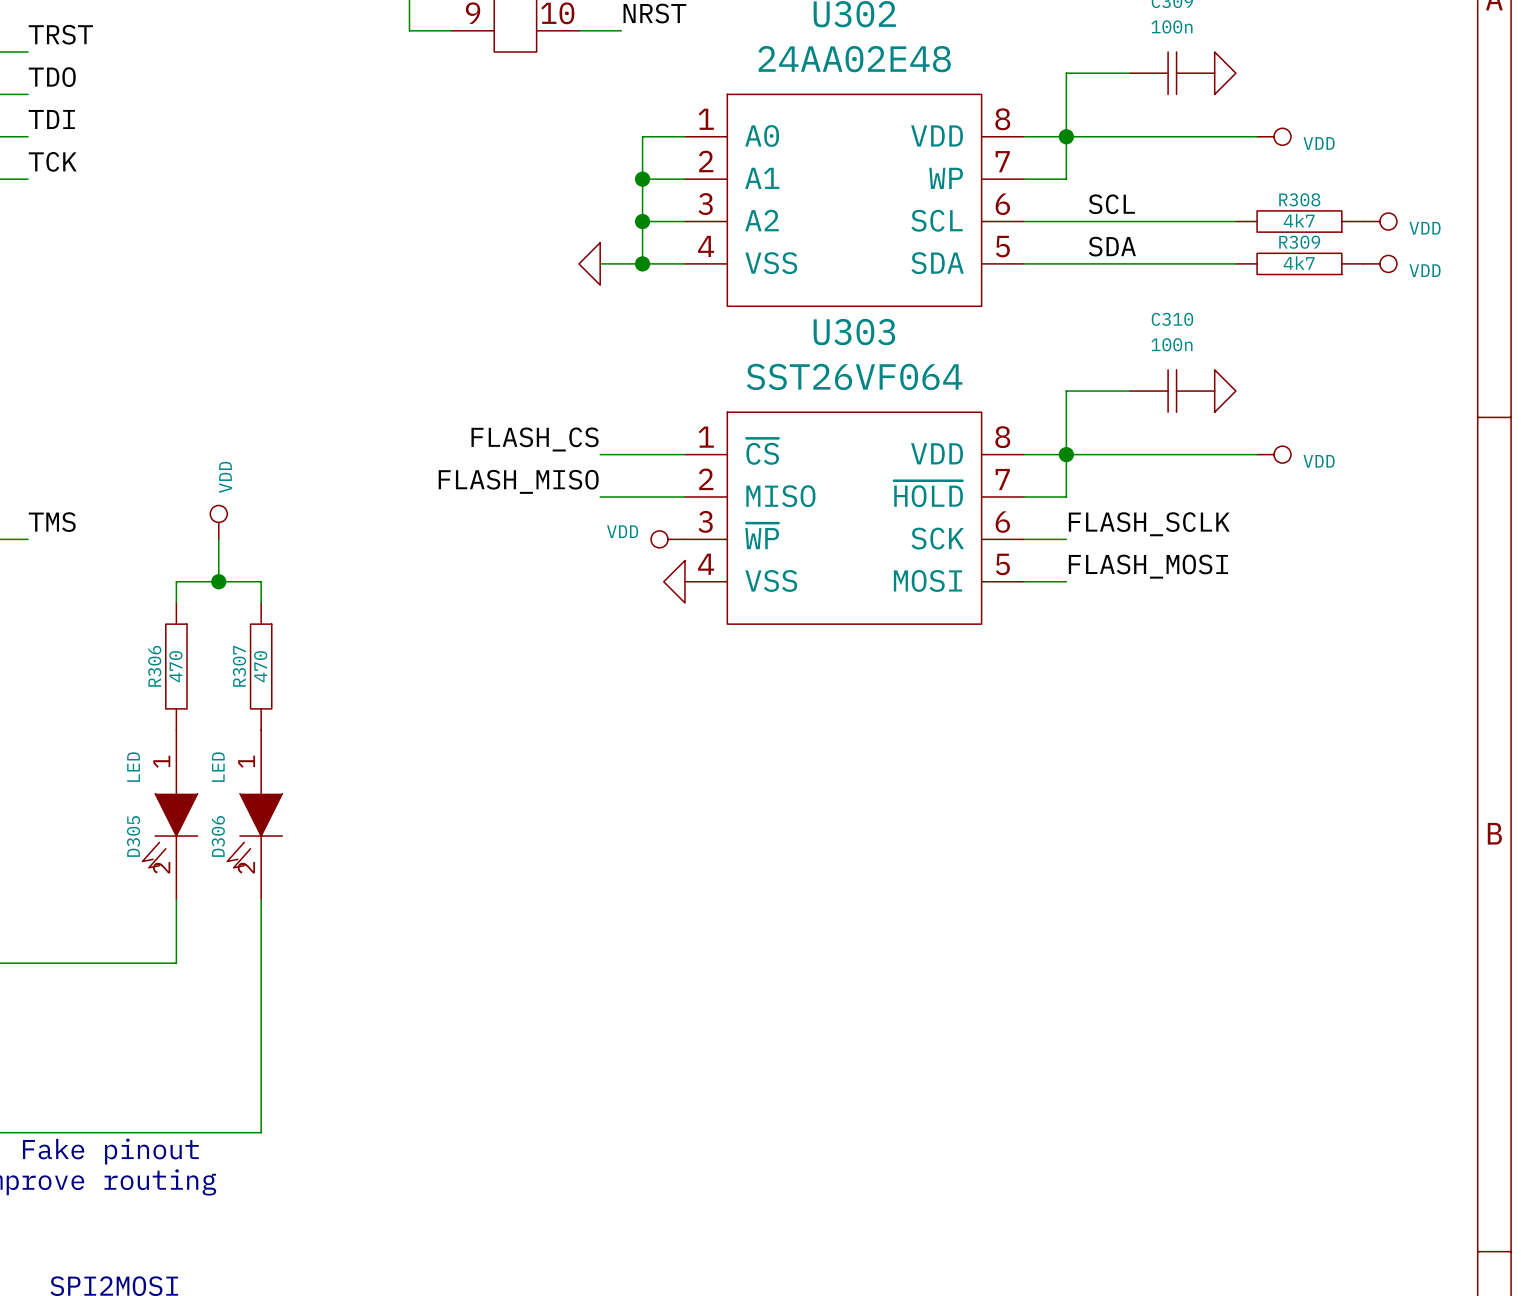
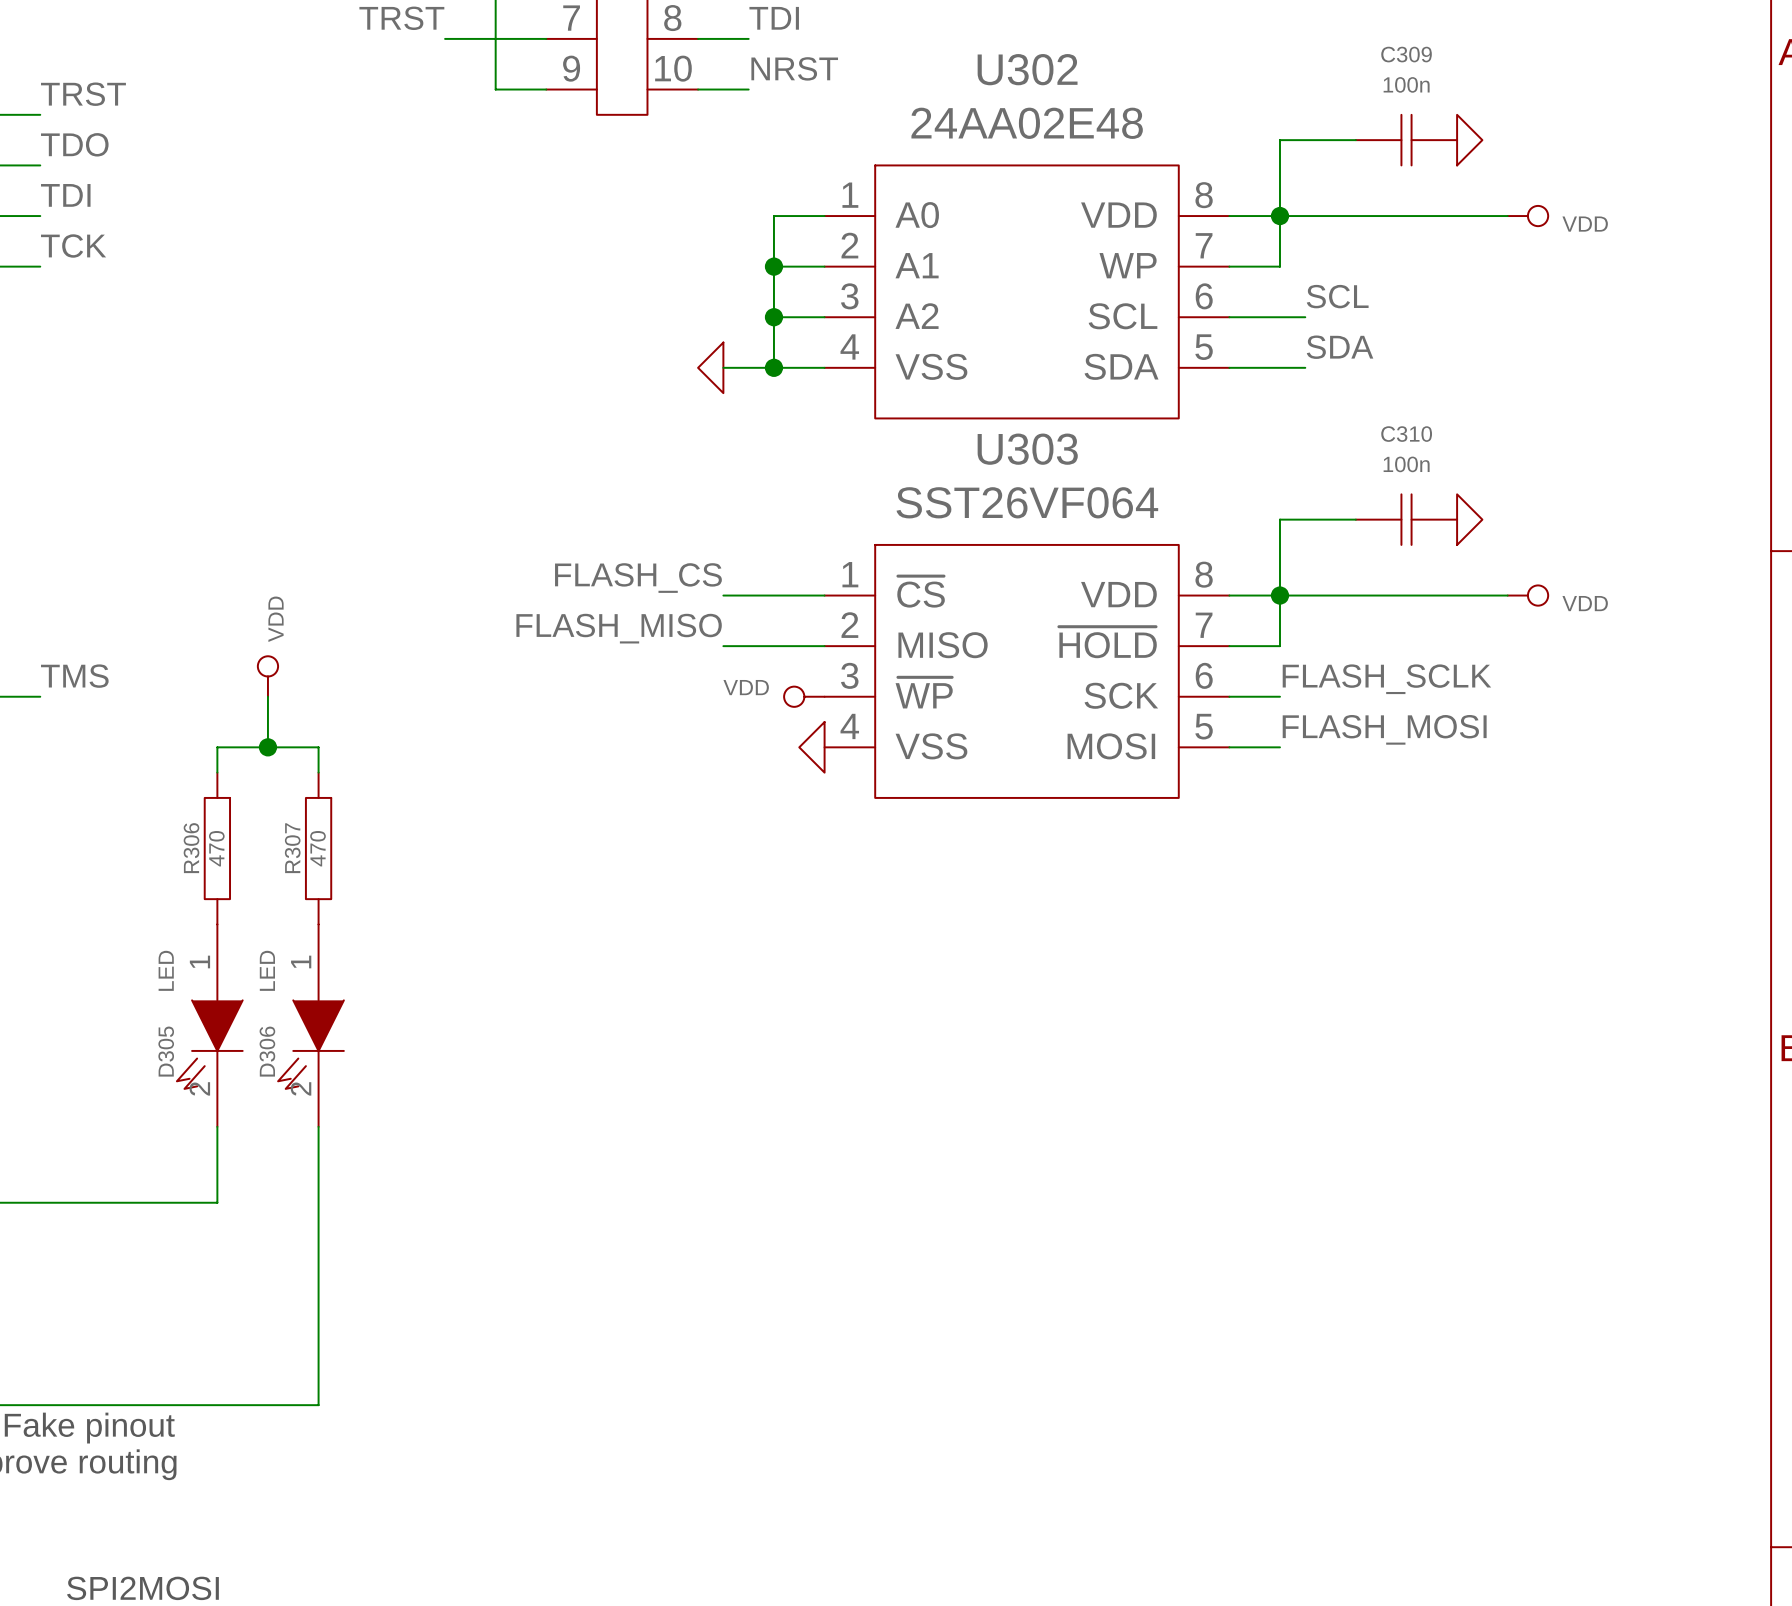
wire: (1087, 221) (1235, 221) -> none
R308: 4k7 (1299, 221) -> none
power symbol: VDD (1379, 221) -> none
wire: (1087, 263) (1235, 263) -> none
R309: 4k7 (1299, 263) -> none
power symbol: VDD (1379, 263) -> none

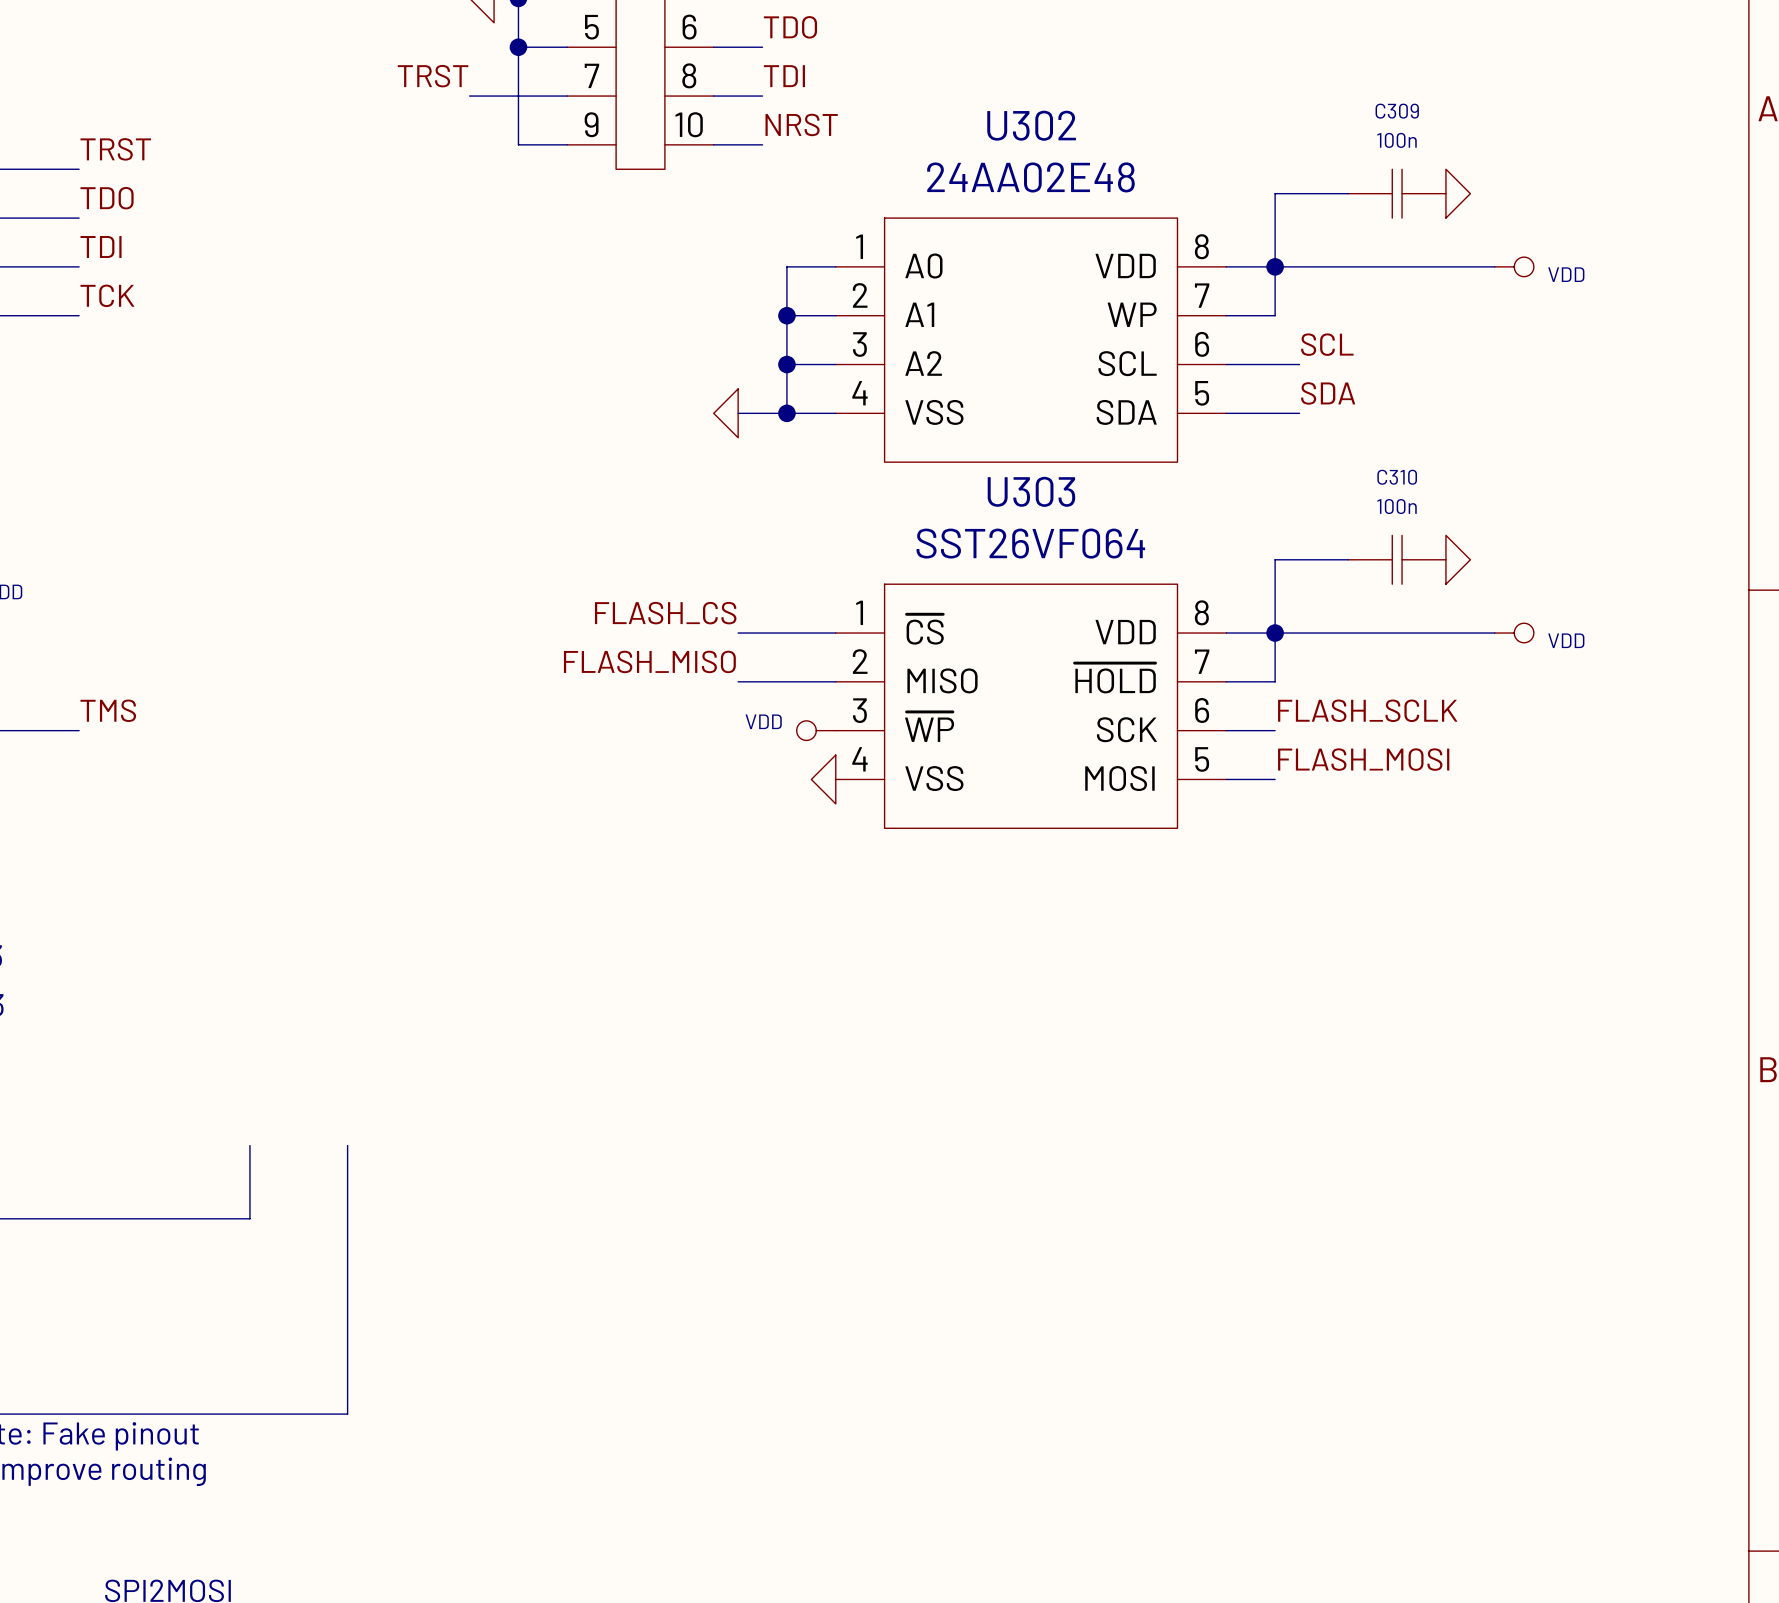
power symbol: VDD (267, 676) -> none
wire: (267, 696) (267, 747) -> none
junction: (267, 747) -> none
wire: (217, 772) (217, 747) (318, 747) (318, 772) -> none
R306: 470 (217, 848) -> none
R307: 470 (318, 848) -> none
D305: LED (209, 1025) -> none
D306: LED (310, 1025) -> none

